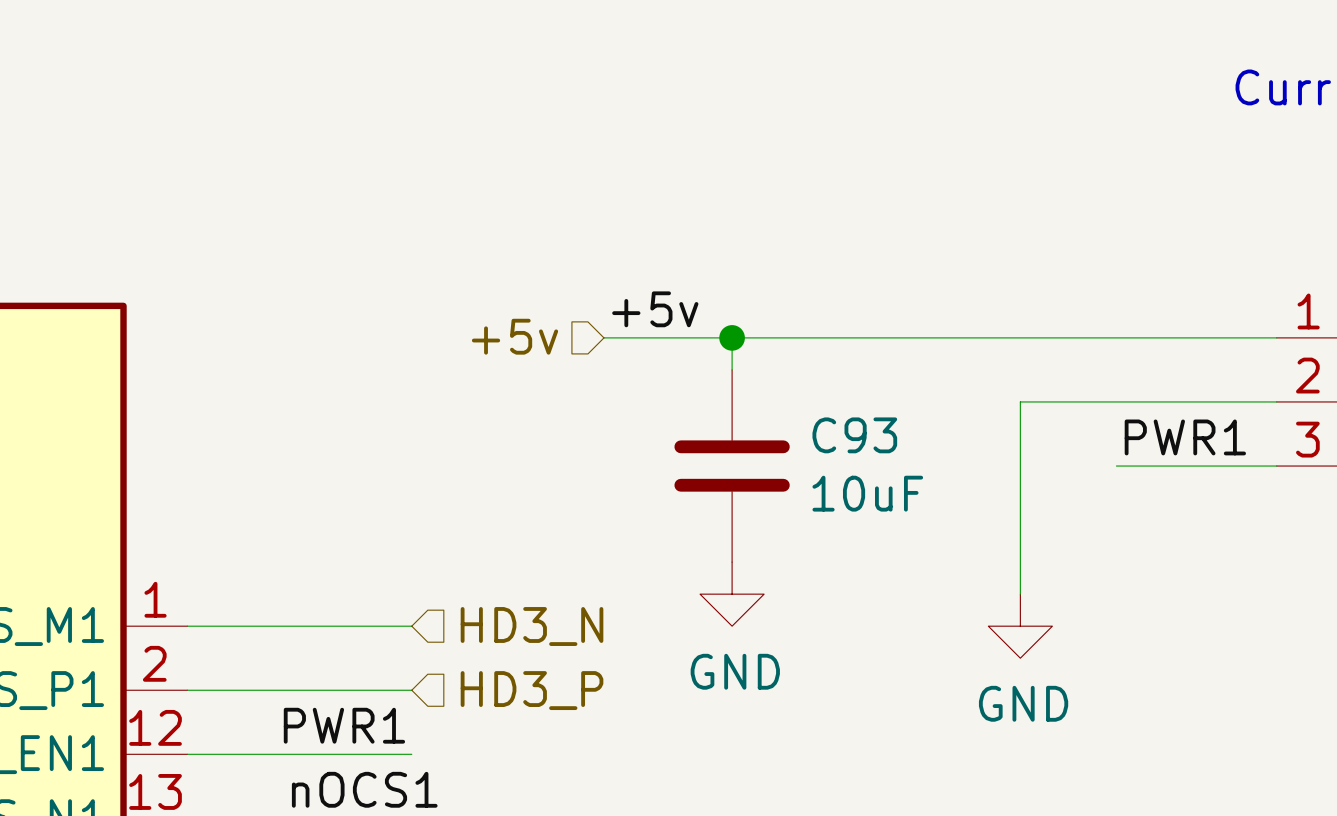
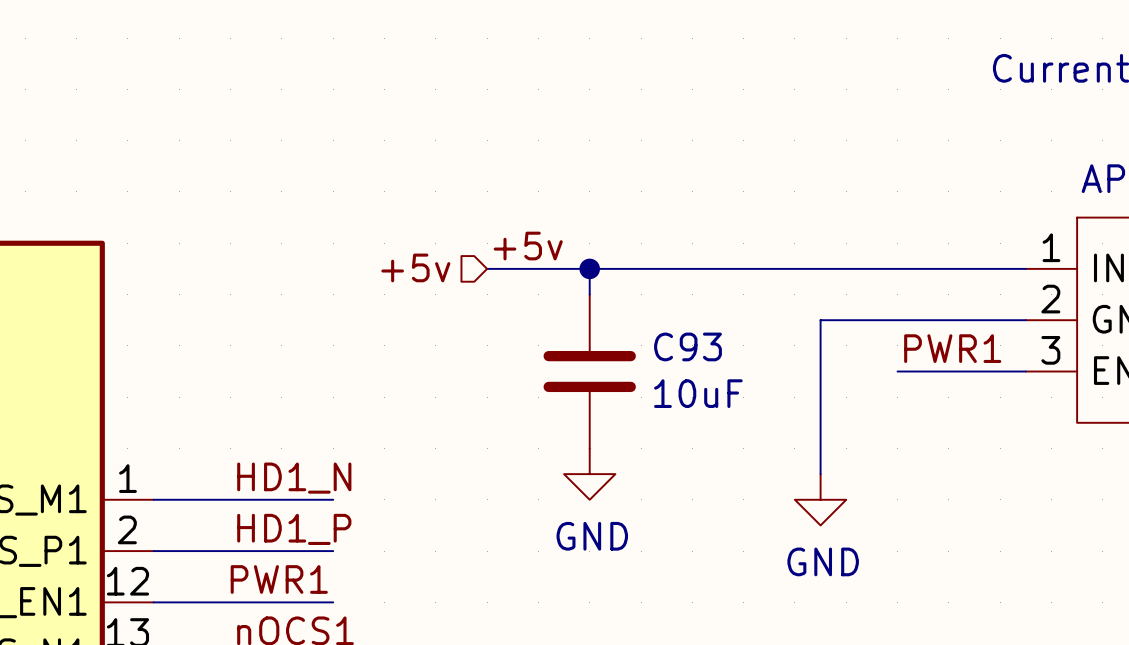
label: none -> HD1_N (294, 478)
hierarchical label: HD3_N (532, 626) -> none
label: none -> HD1_P (294, 529)
hierarchical label: HD3_P (532, 690) -> none

